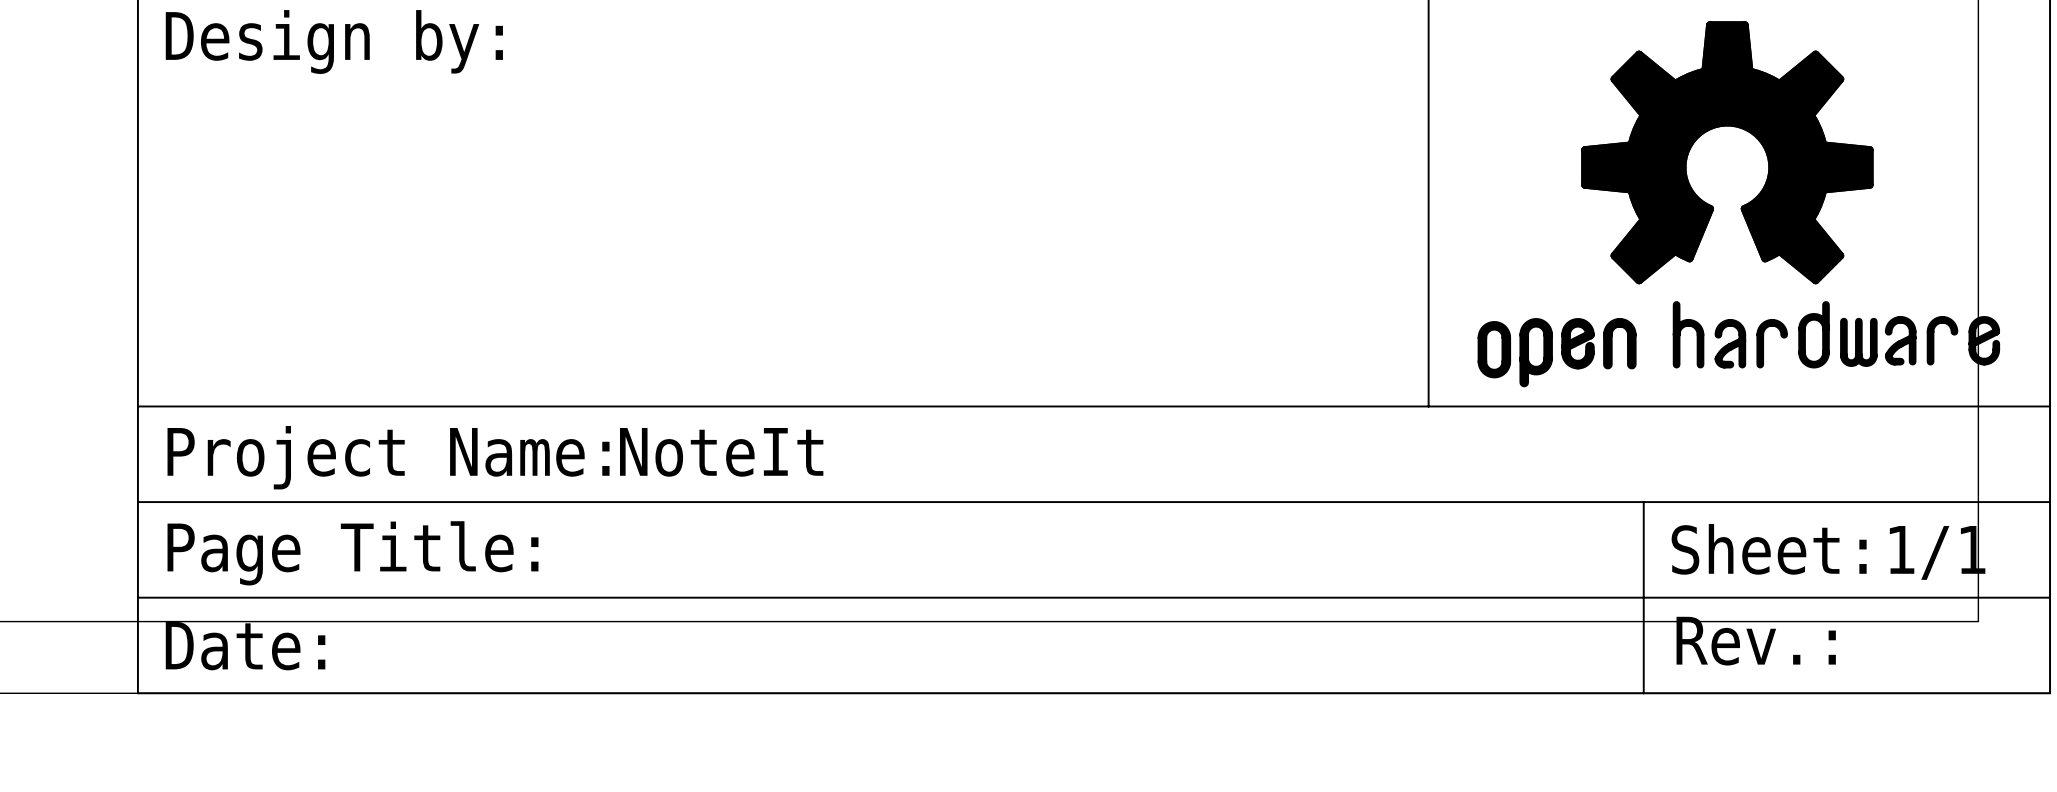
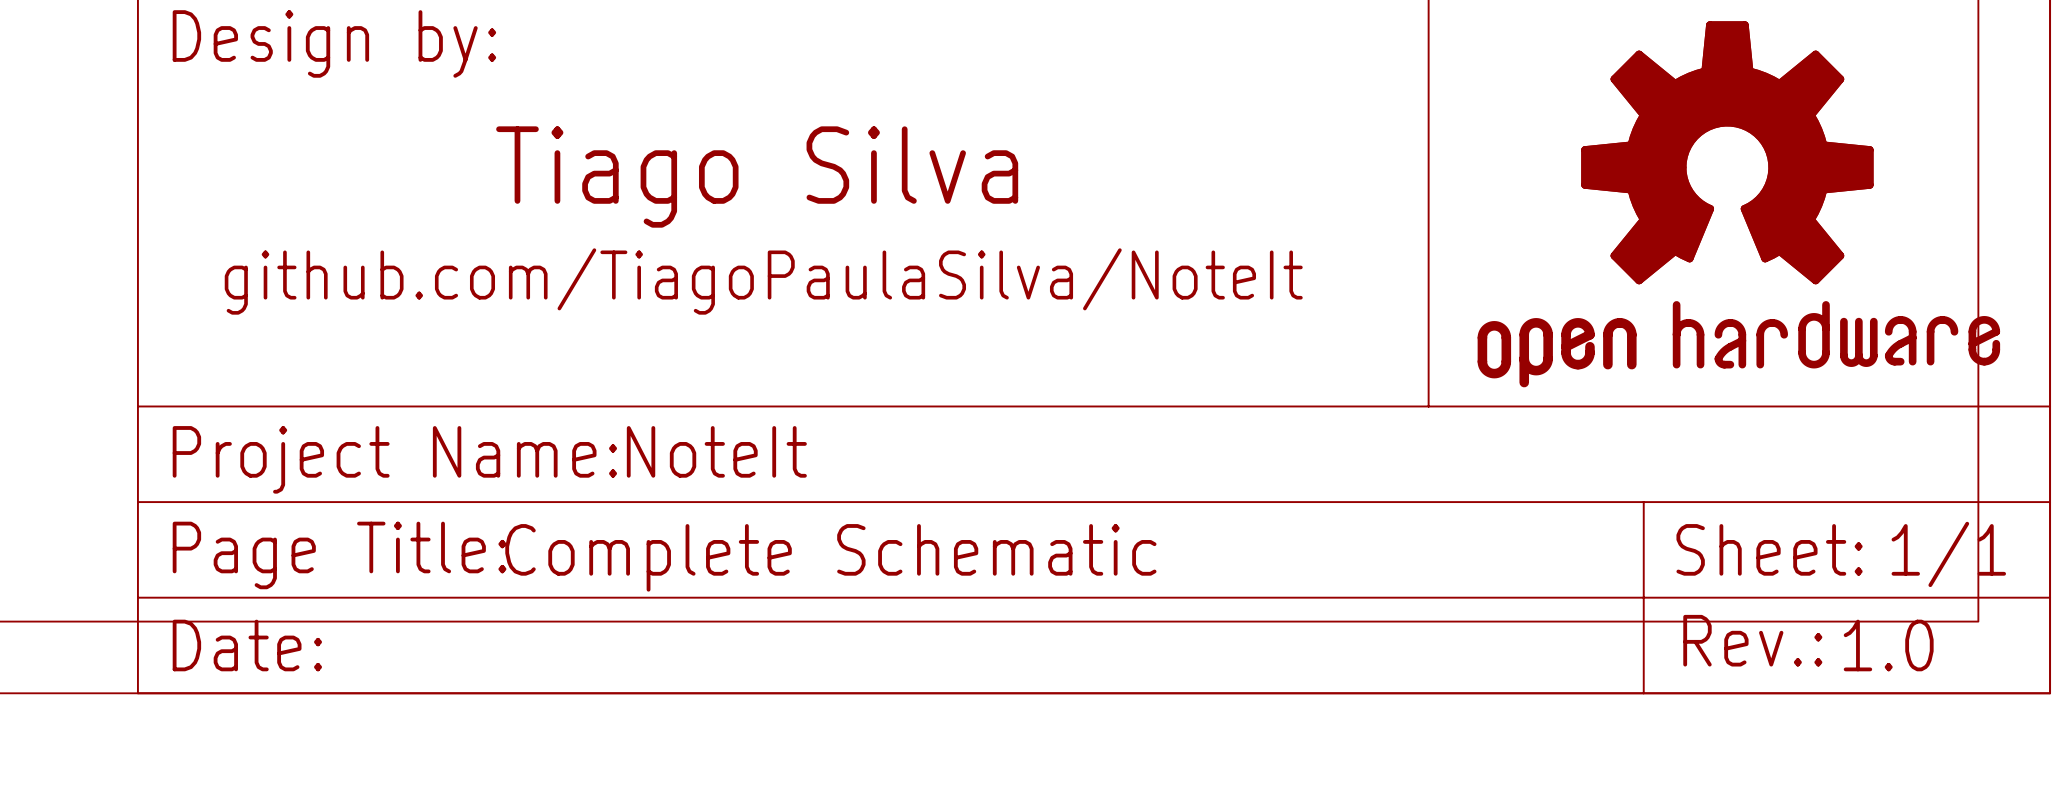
text: none -> Tiago Silva (757, 177)
text: none -> github.com/TiagoPaulaSilva/NoteIt (763, 281)
text: none -> Complete Schematic (830, 557)
text: none -> 1.0 (1888, 645)

